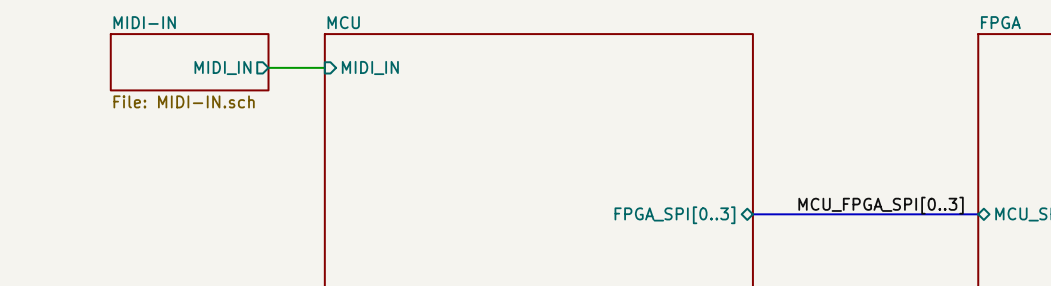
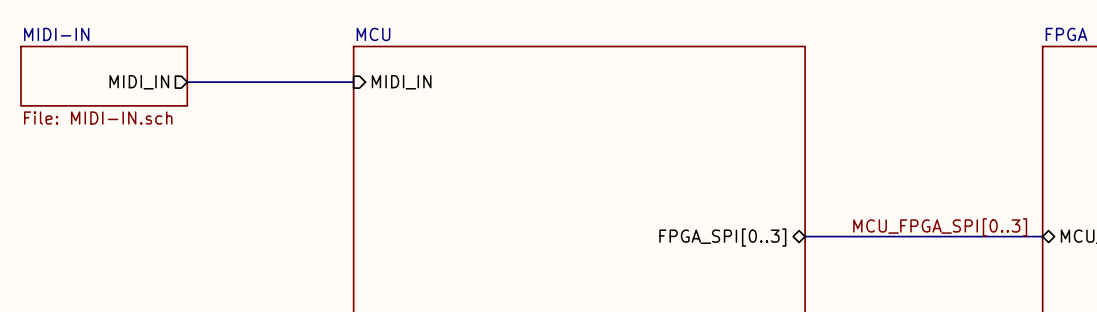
sheet MIDI-IN position: (189, 62) -> (104, 76)
wire: none -> (187, 82) (294, 82)
sheet pin position: MIDI_IN (223, 67) -> MIDI_IN (139, 82)

